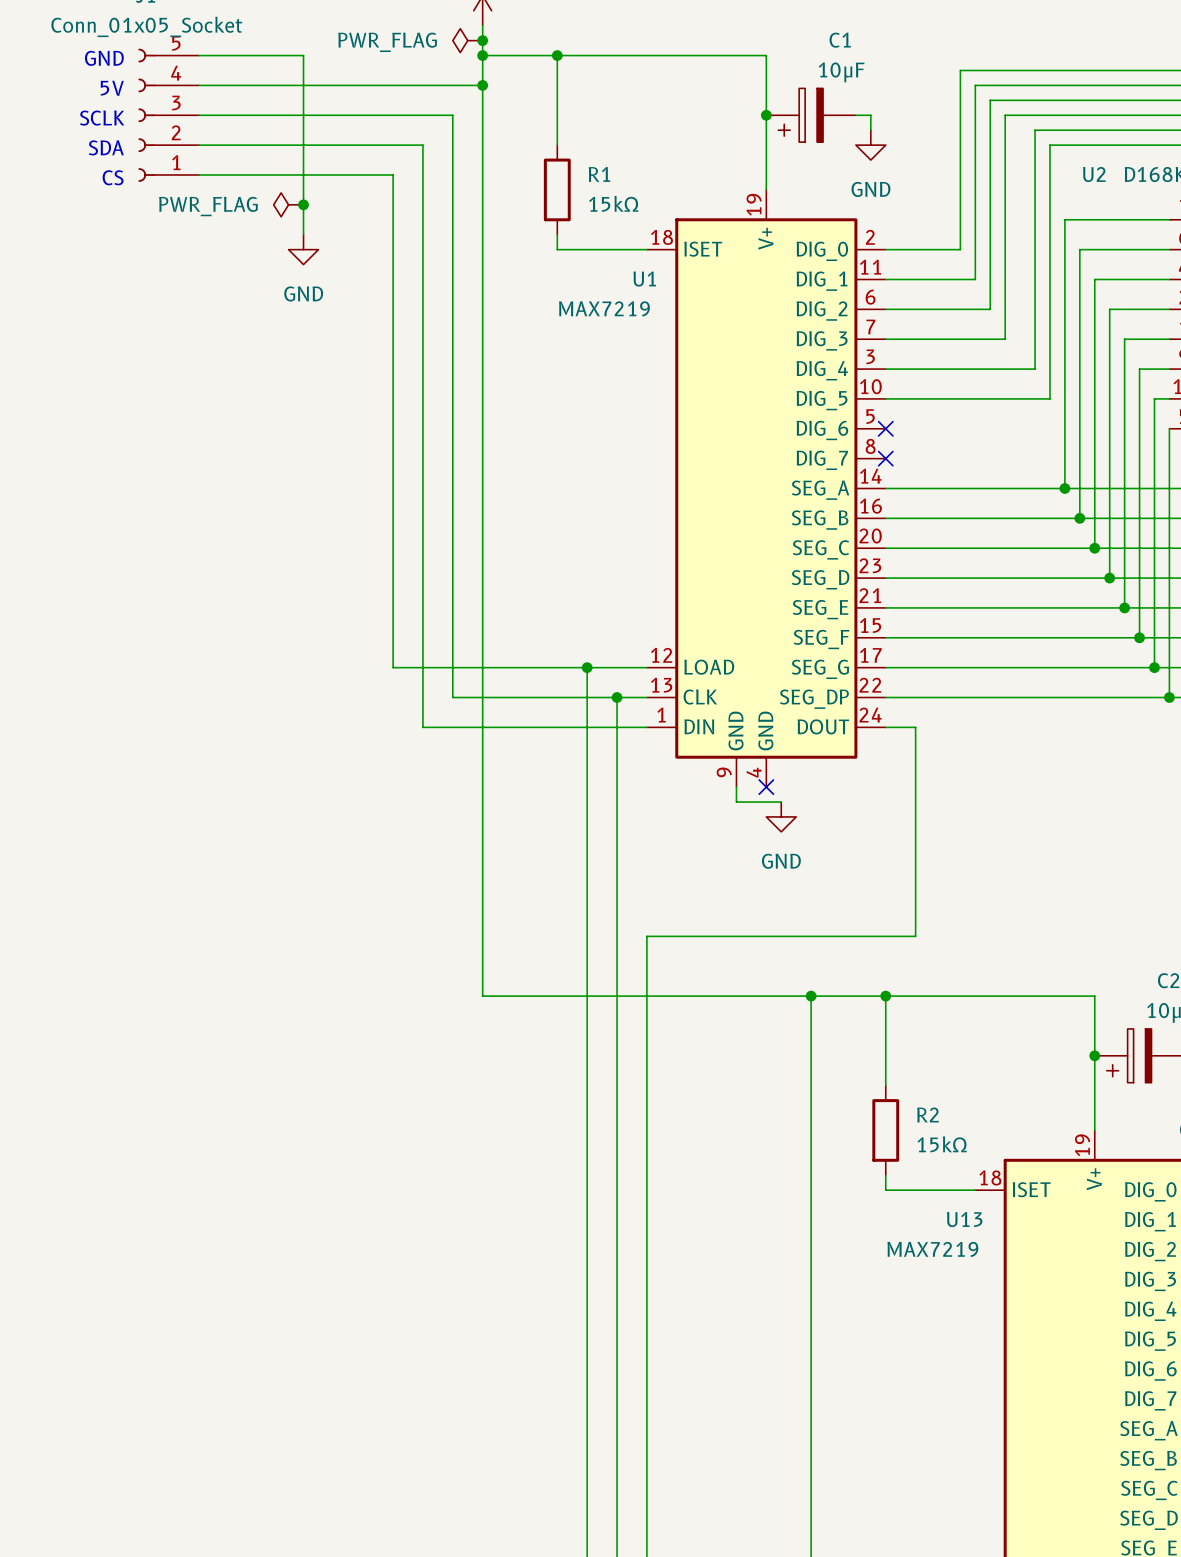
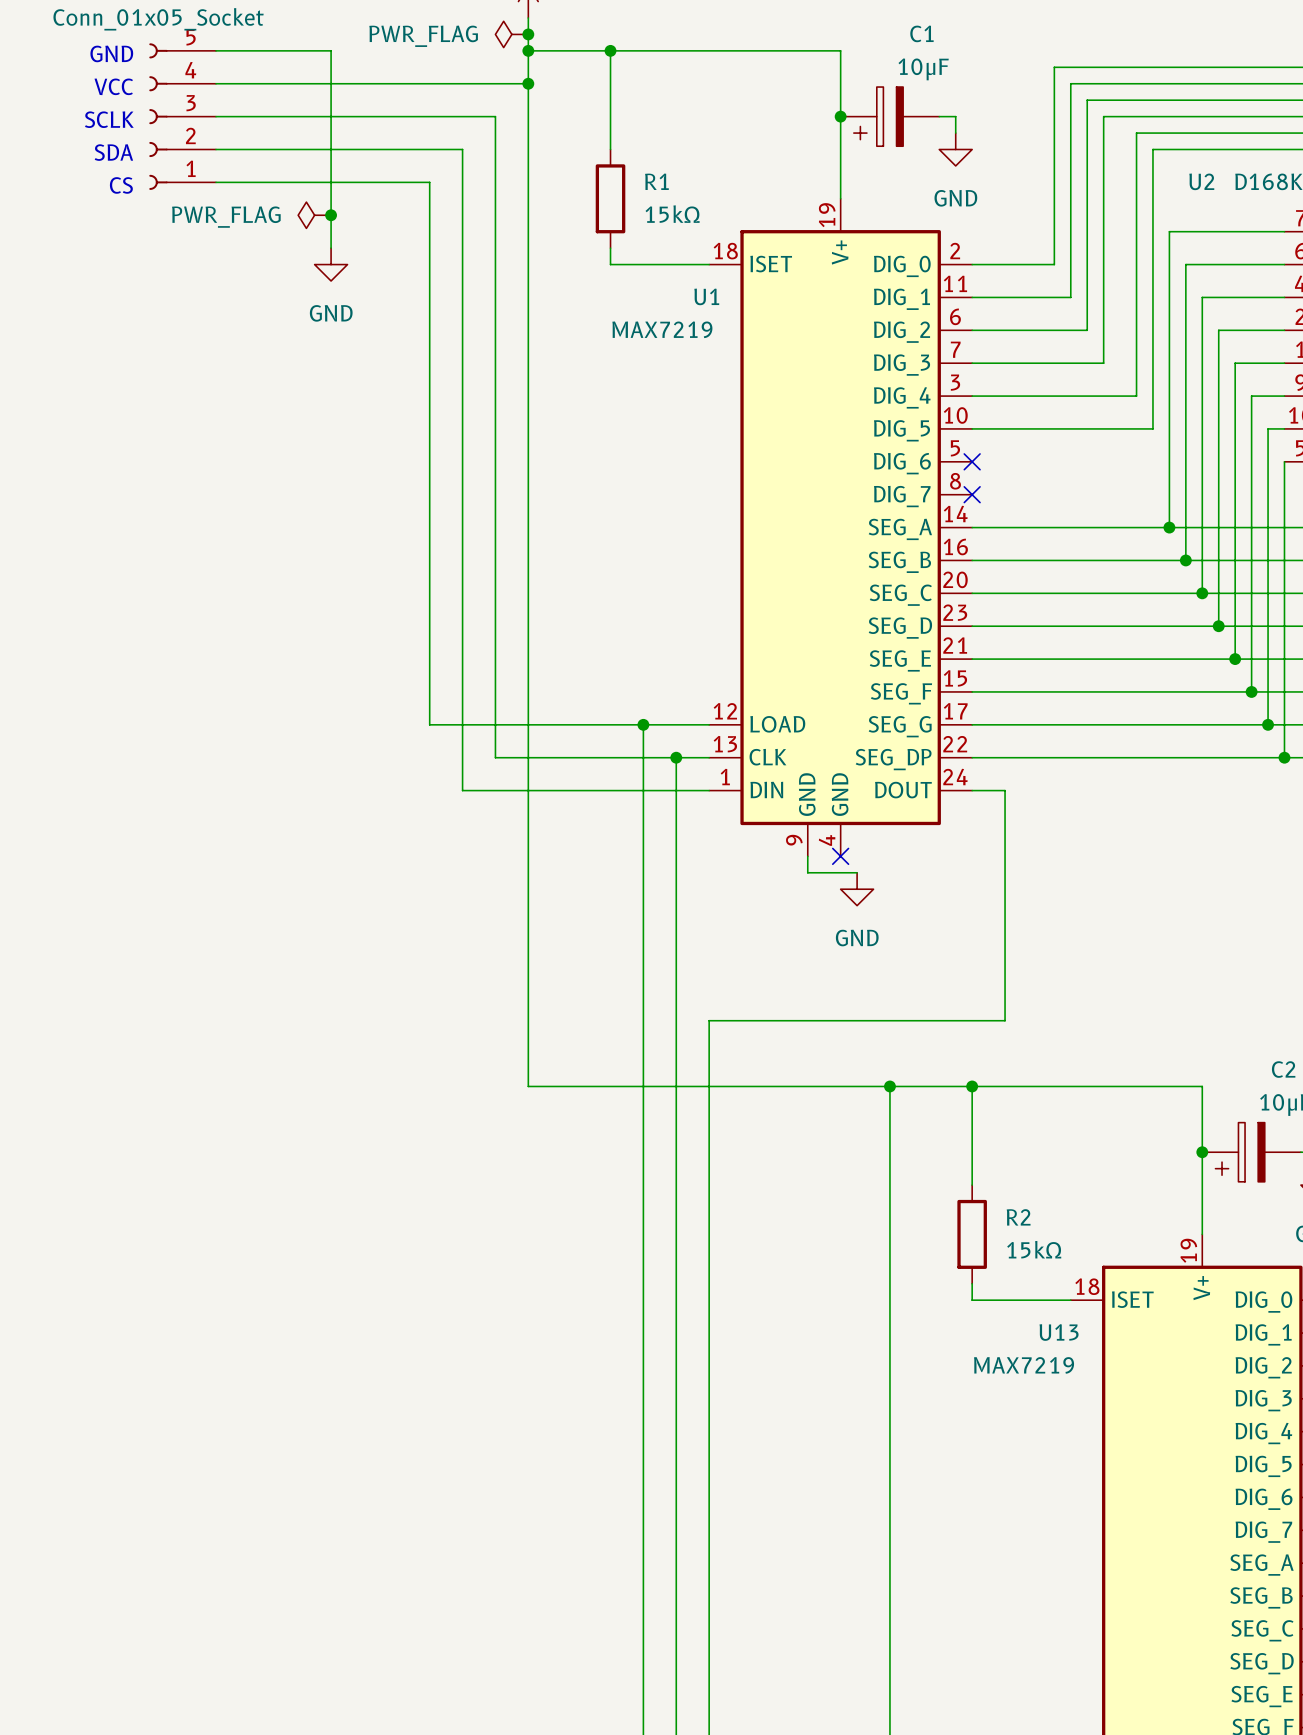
text: 5V (112, 88) -> VCC (113, 86)

